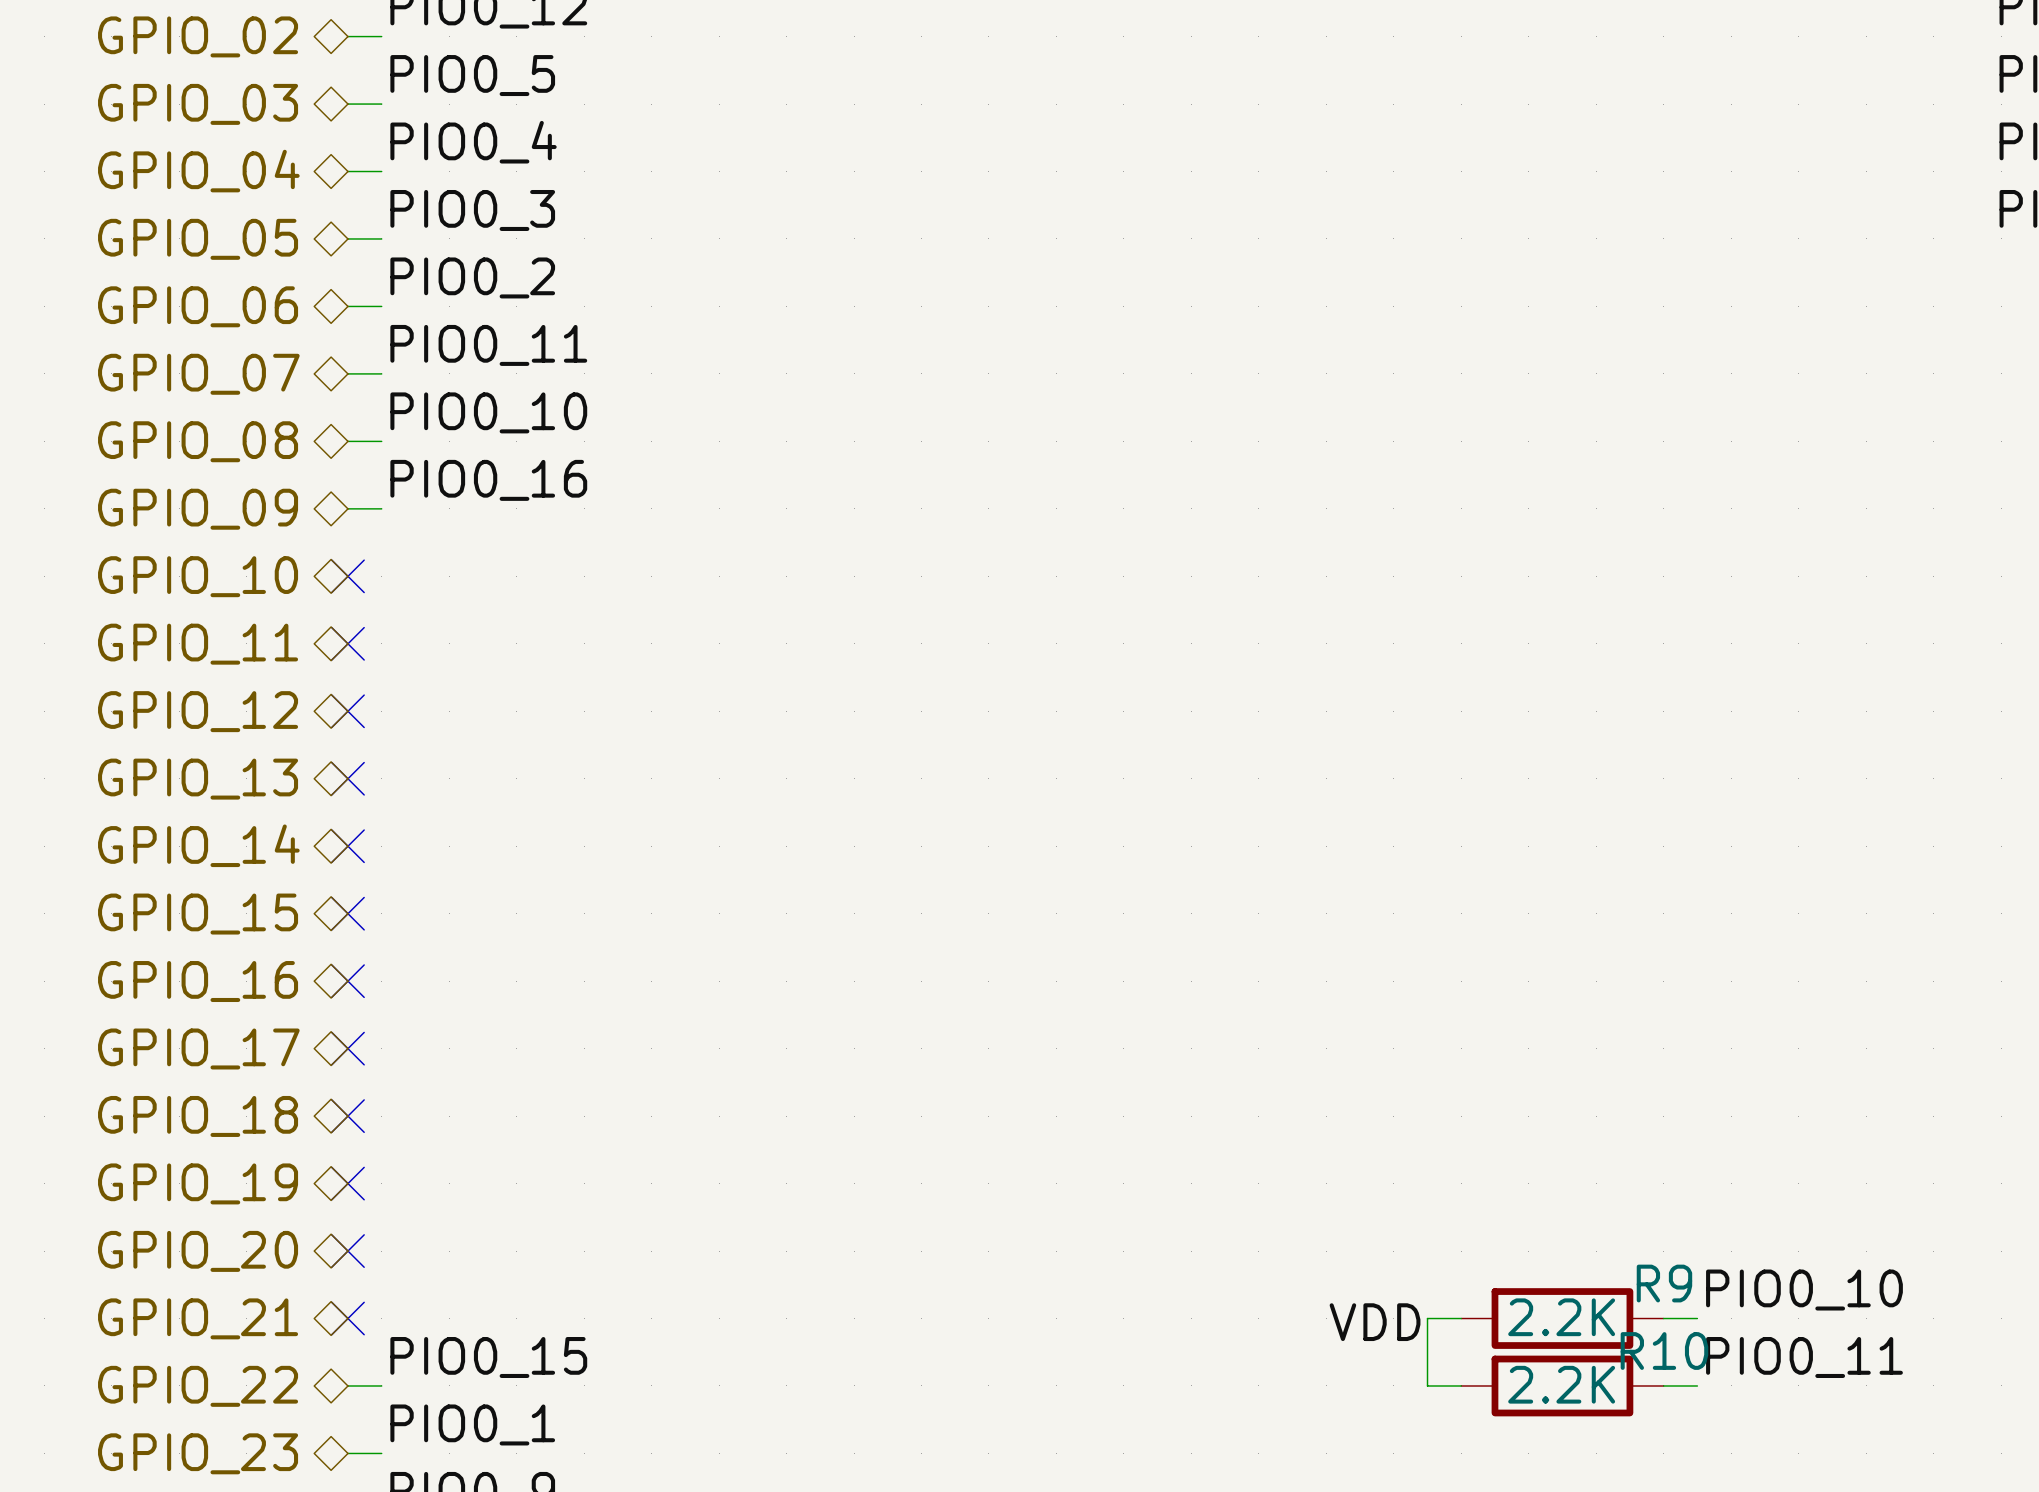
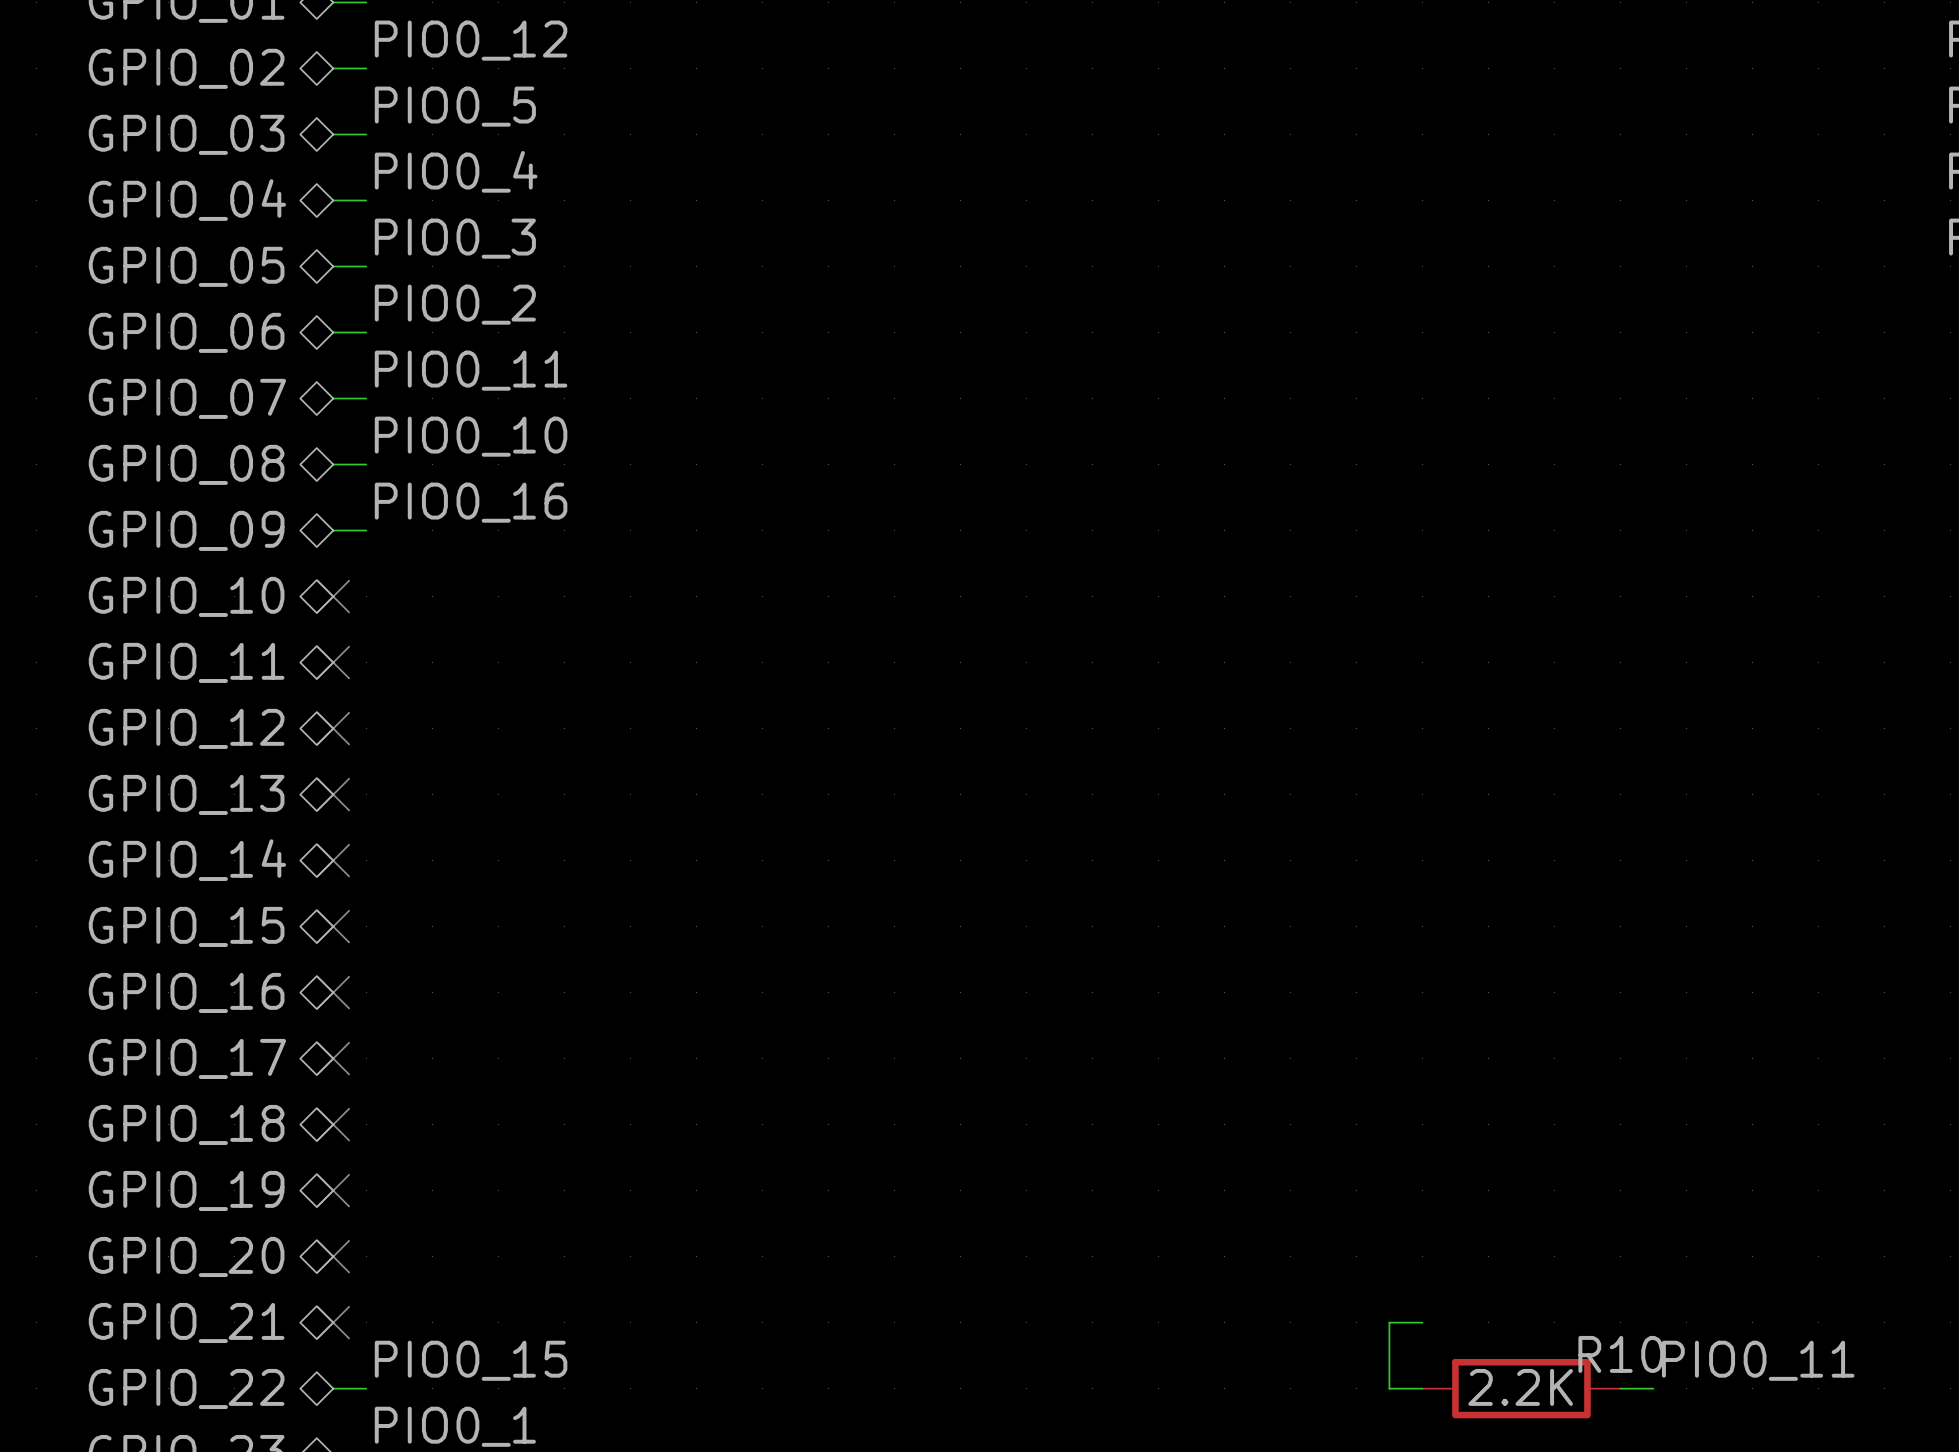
label: PIO0_10 (1804, 1290) -> none
R9: 2.2K (1562, 1318) -> none
wire: (1663, 1318) (1697, 1318) -> none
label: VDD (1375, 1322) -> none

